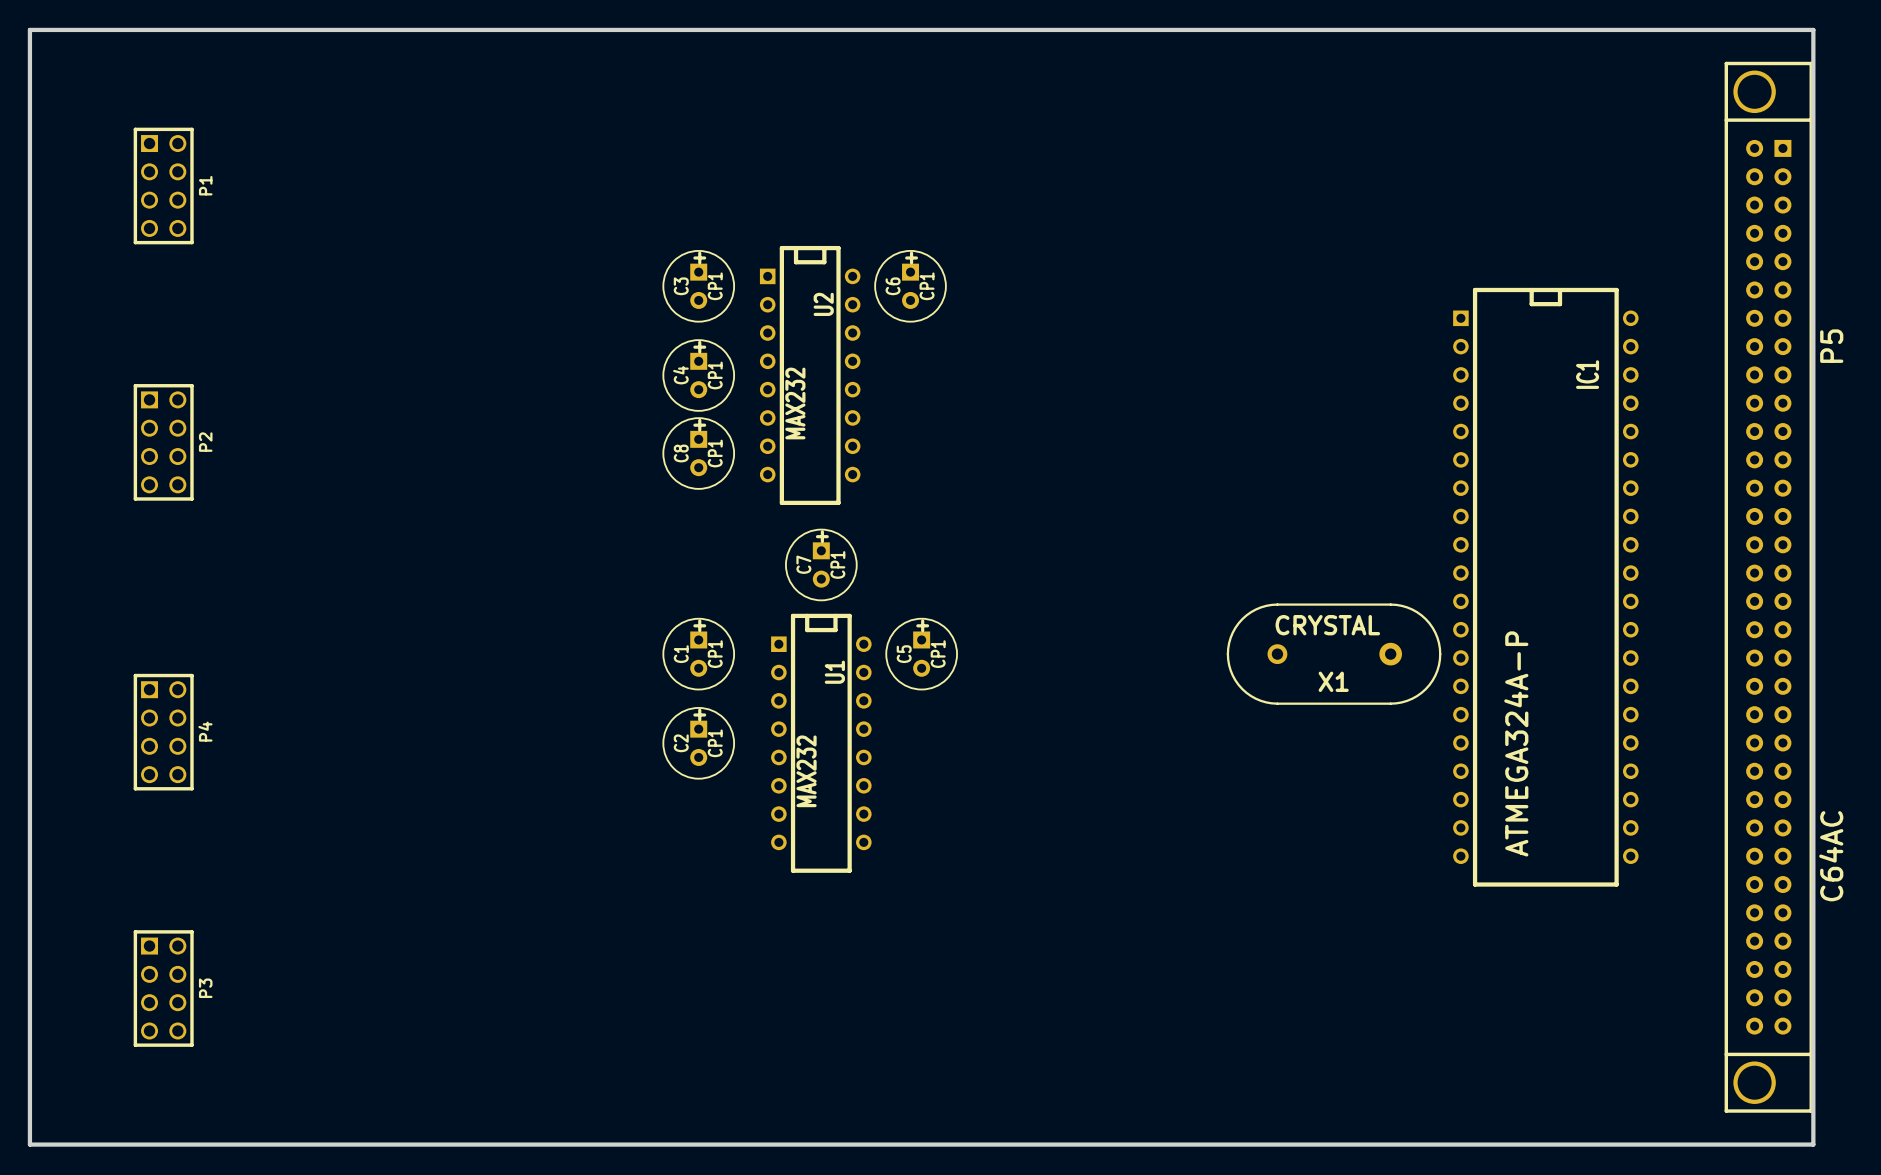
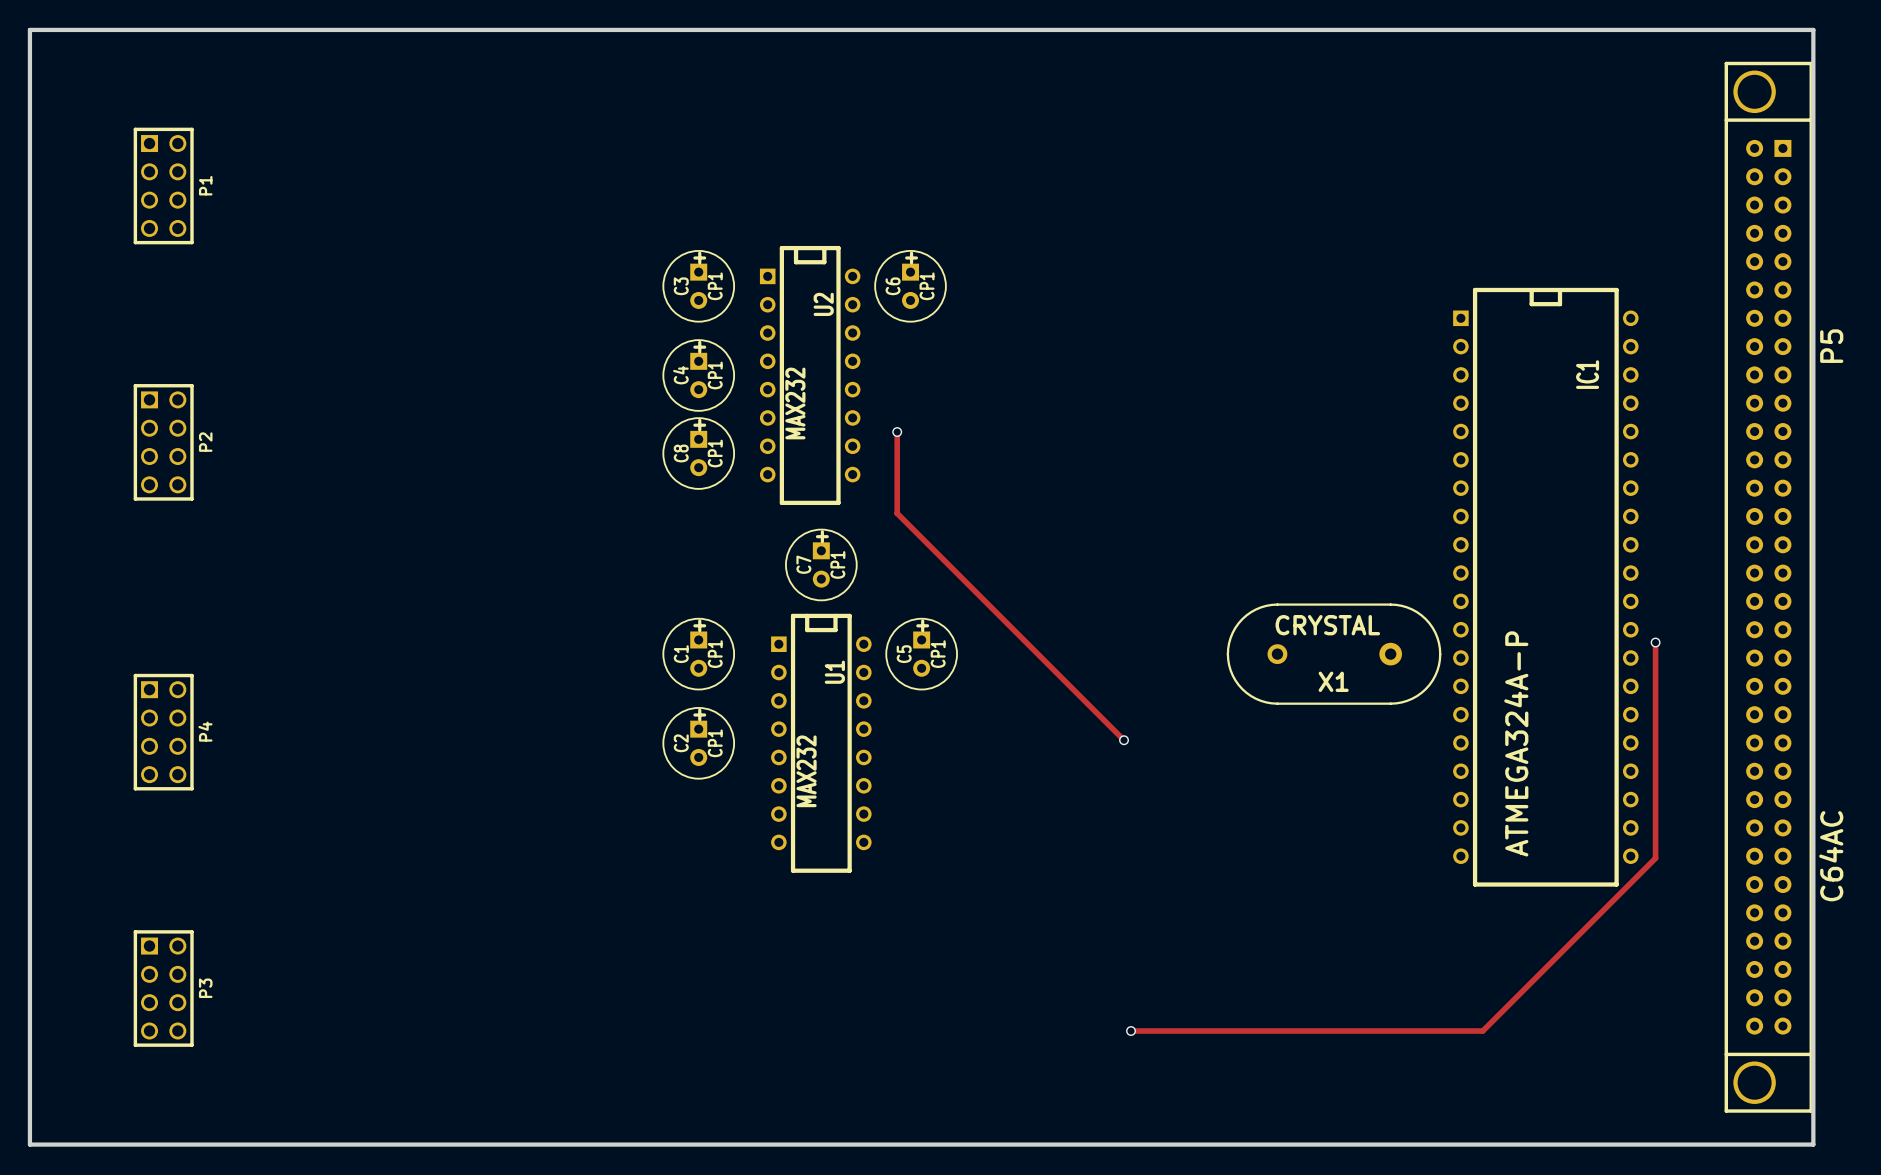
track: none -> (897, 432) (897, 513) (1124, 740)
via: none -> (897, 432)
track: none -> (1655, 642) (1655, 858) (1482, 1031) (1131, 1031)
via: none -> (1655, 642)
via: none -> (1124, 740)
via: none -> (1131, 1031)

